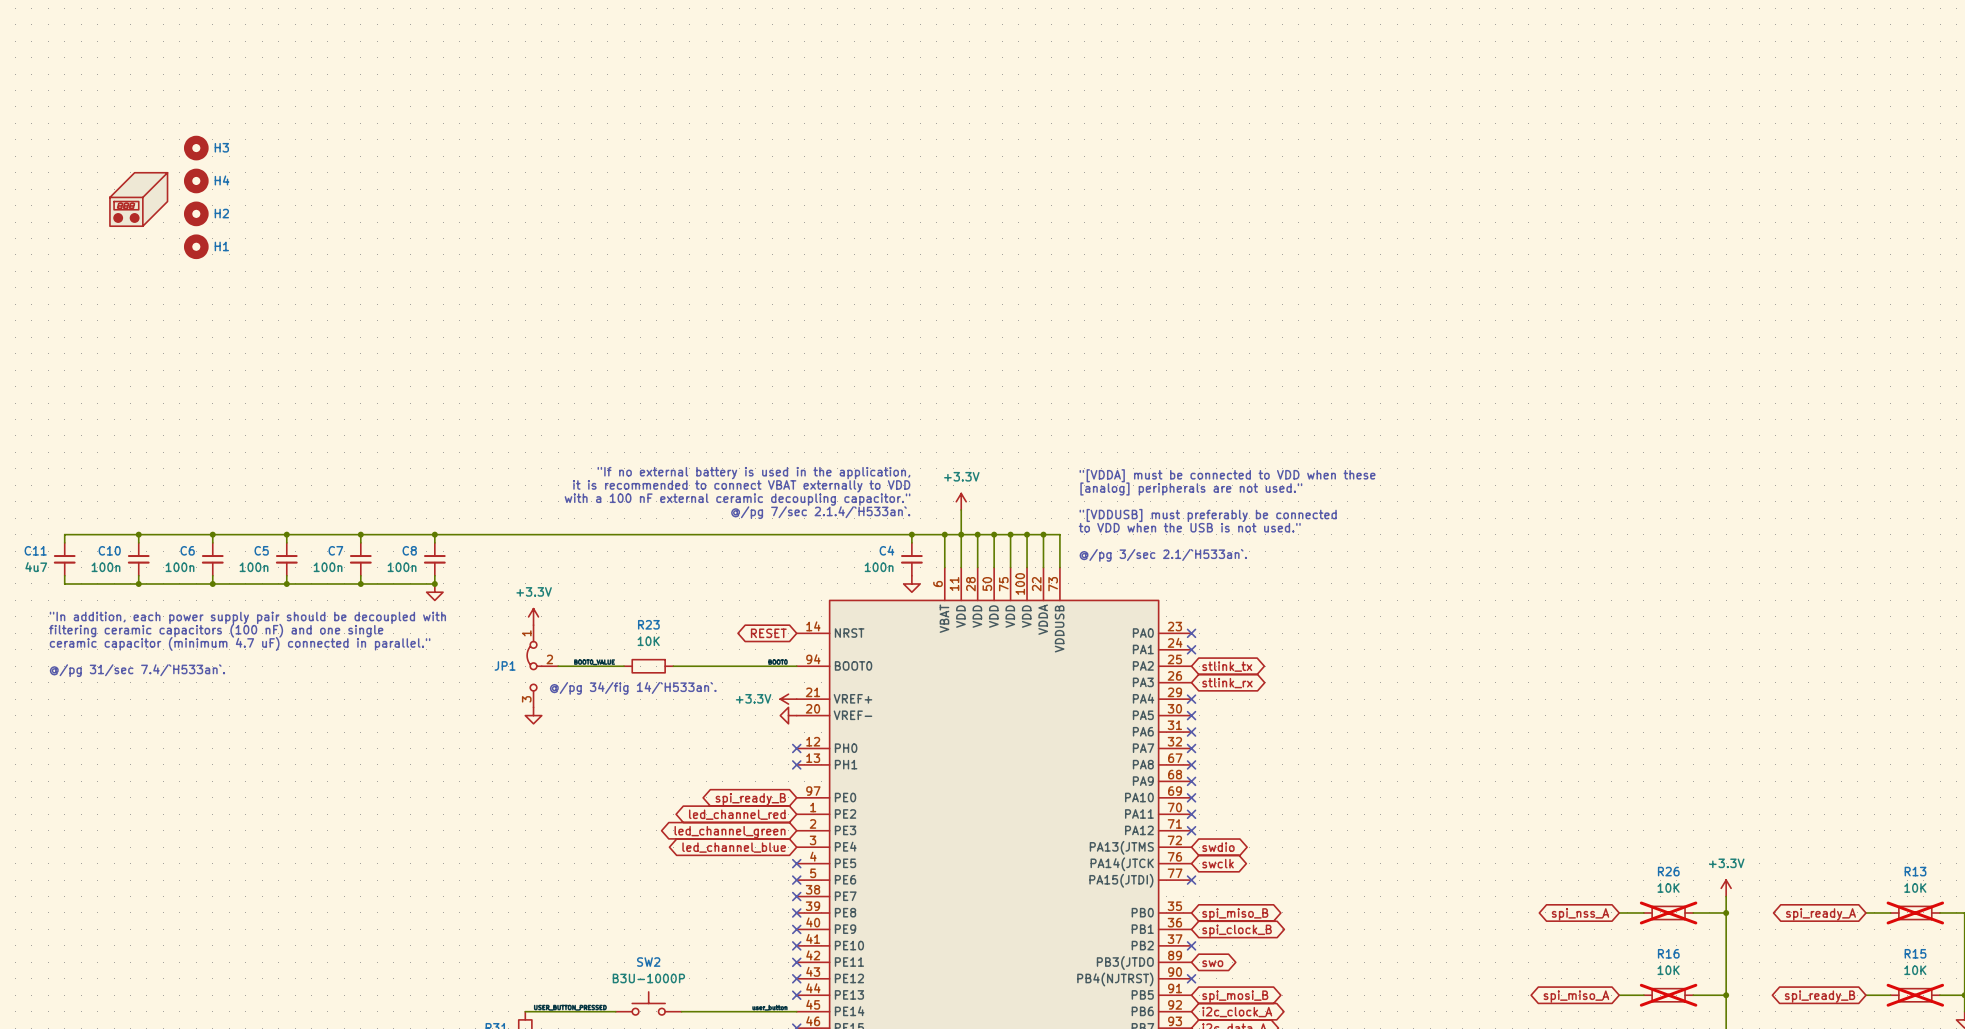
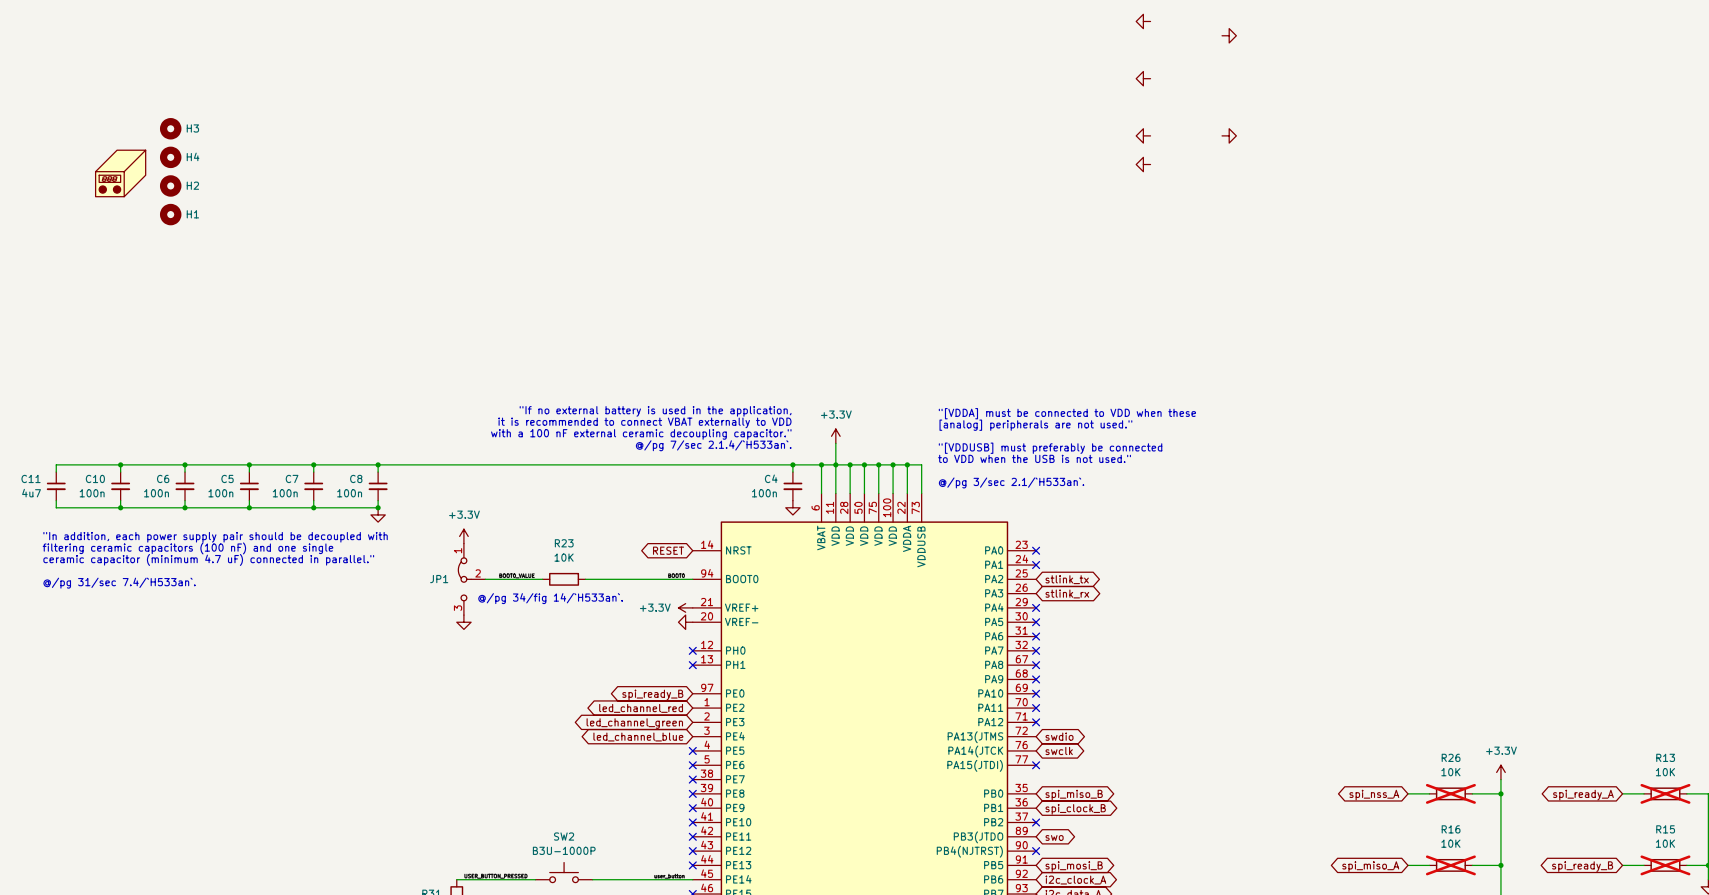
power symbol: none -> (1143, 21)
power symbol: none -> (1229, 35)
power symbol: none -> (1143, 78)
power symbol: none -> (1143, 135)
power symbol: none -> (1229, 135)
power symbol: none -> (1143, 164)

